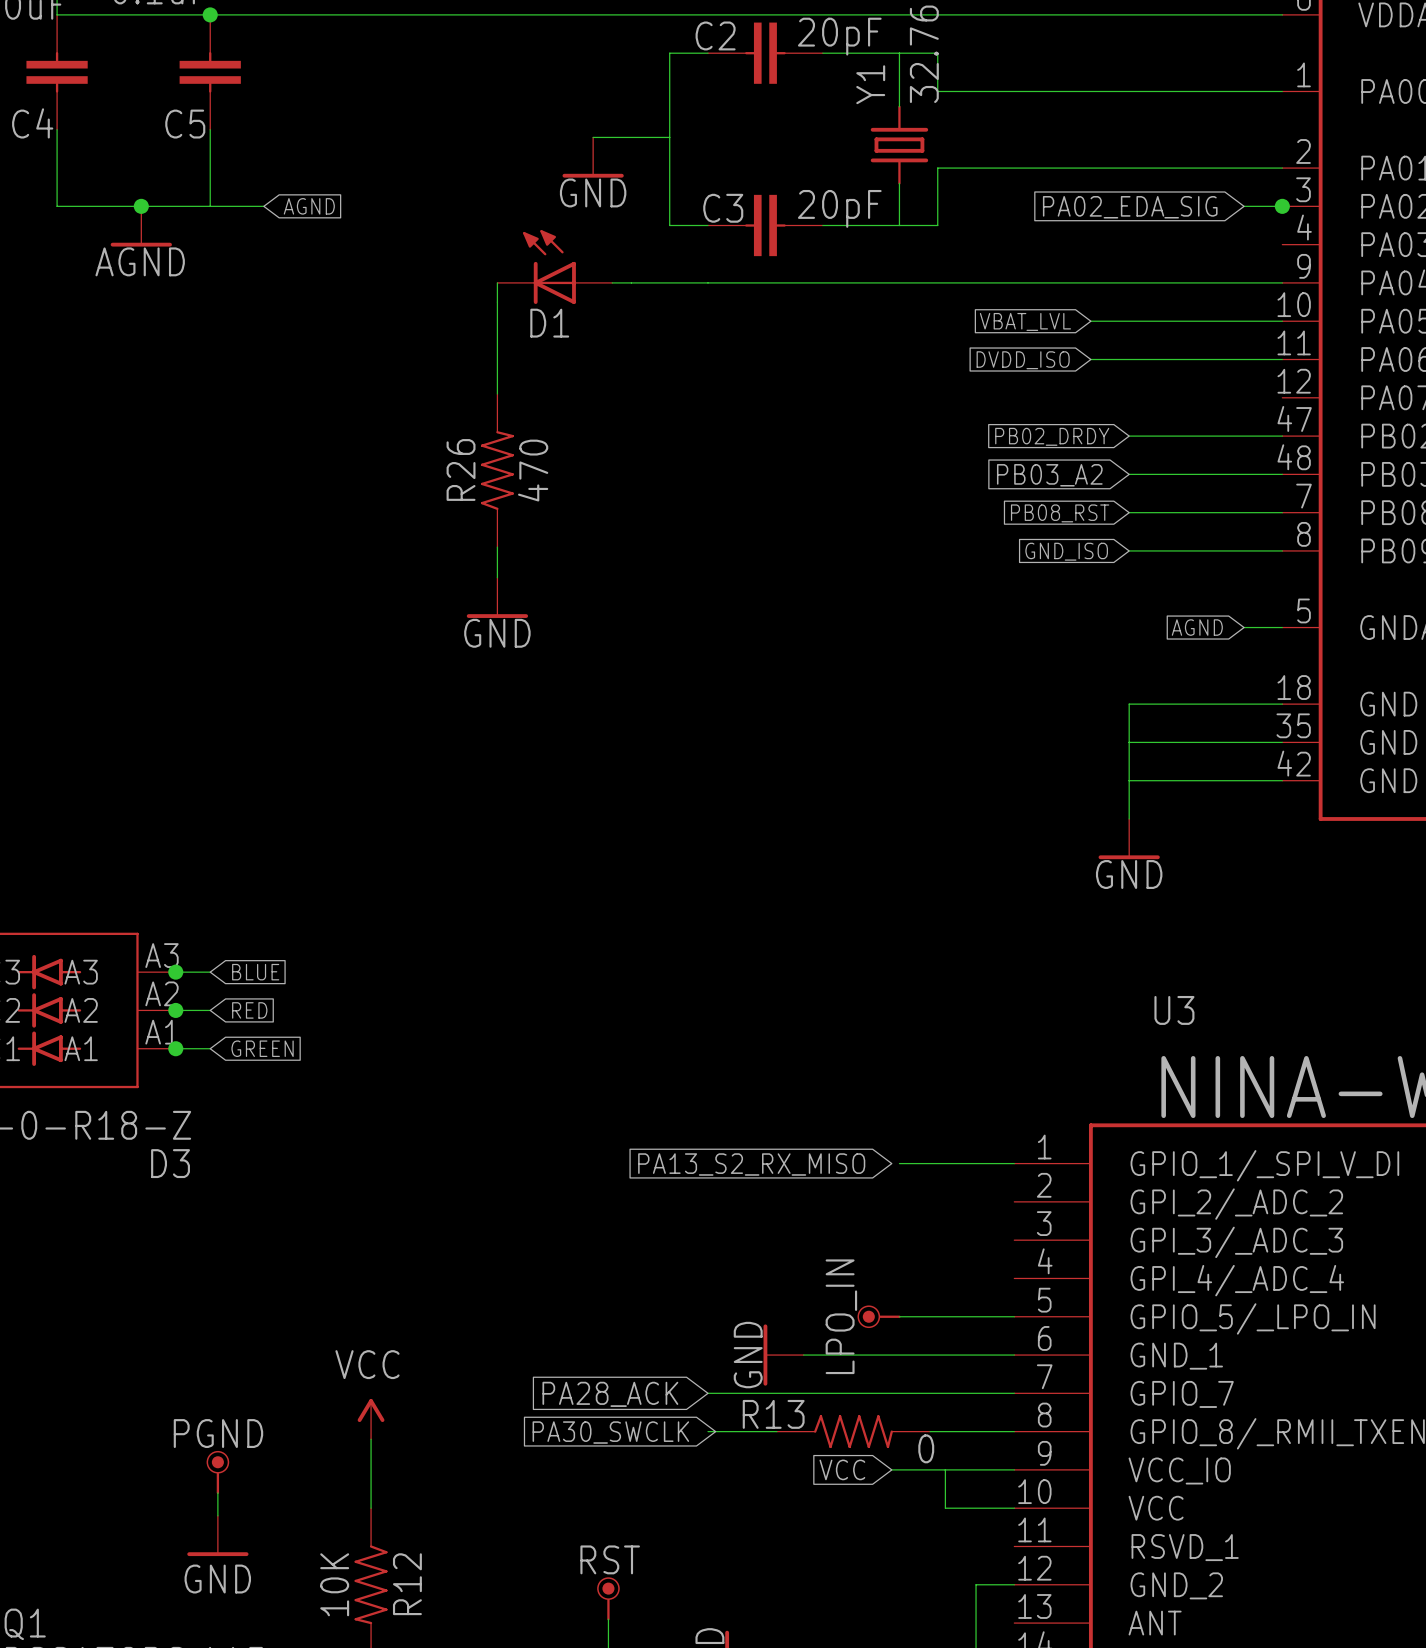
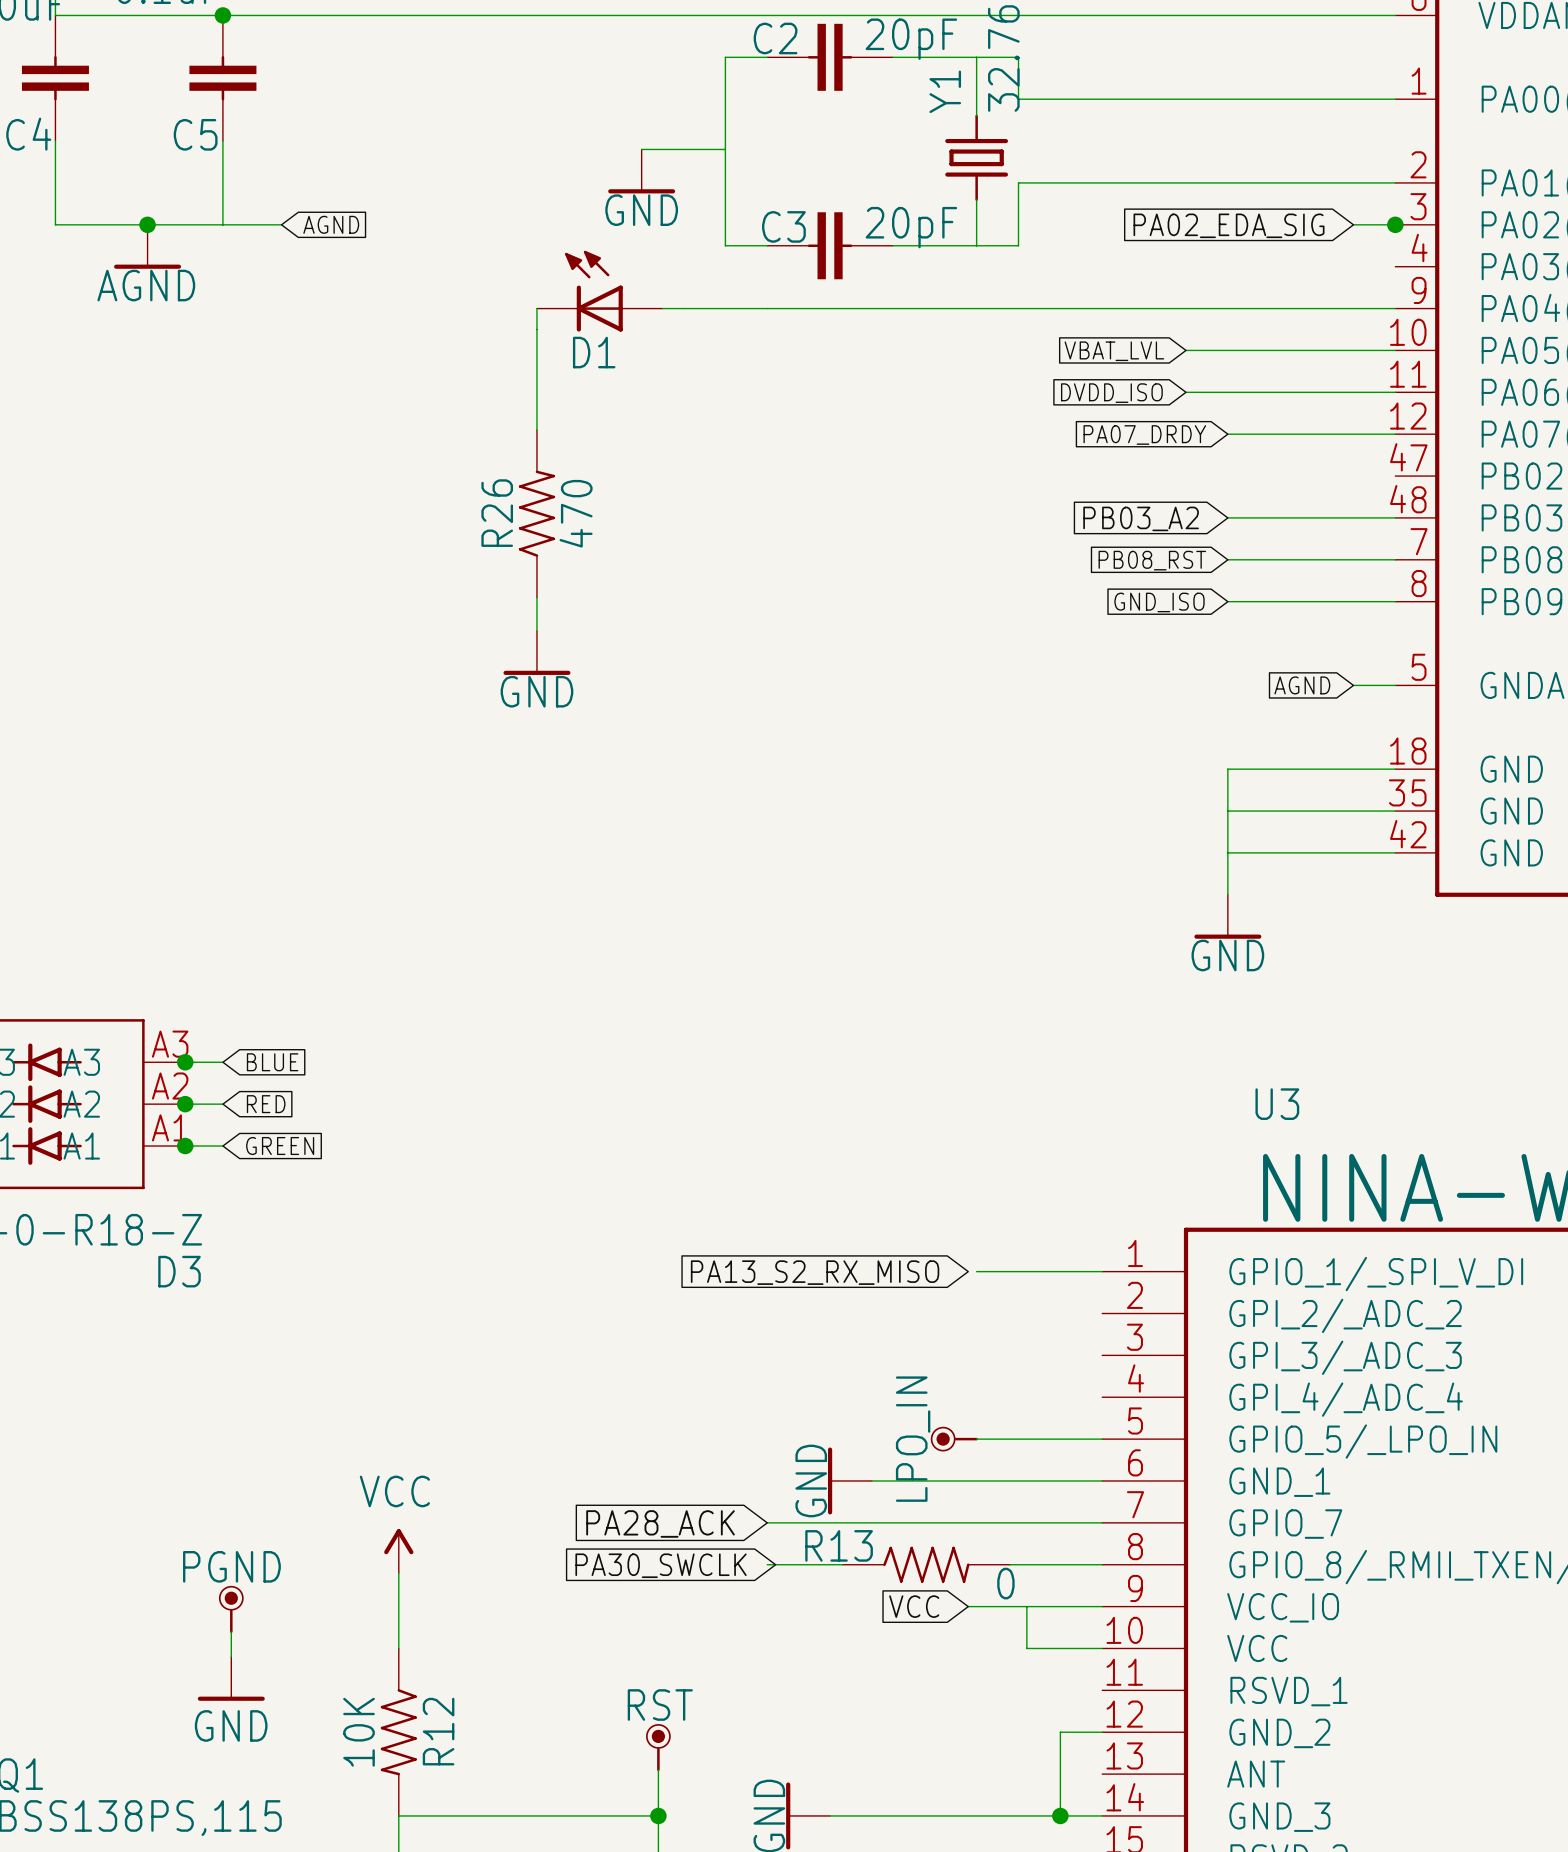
global label: none -> PA07_DRDY (1144, 434)
global label: PB02_DRDY (1052, 436) -> none
wire: (1129, 436) (1282, 436) -> (1227, 434) (1395, 434)

